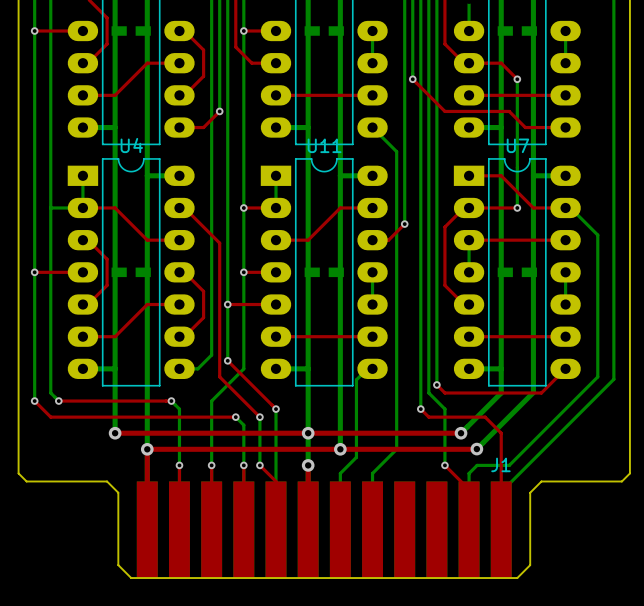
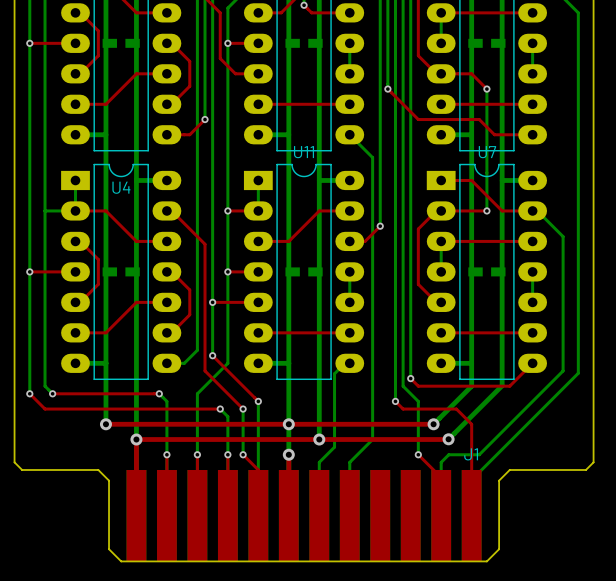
U4 name position: U4 (131, 145) -> U4 (121, 187)

